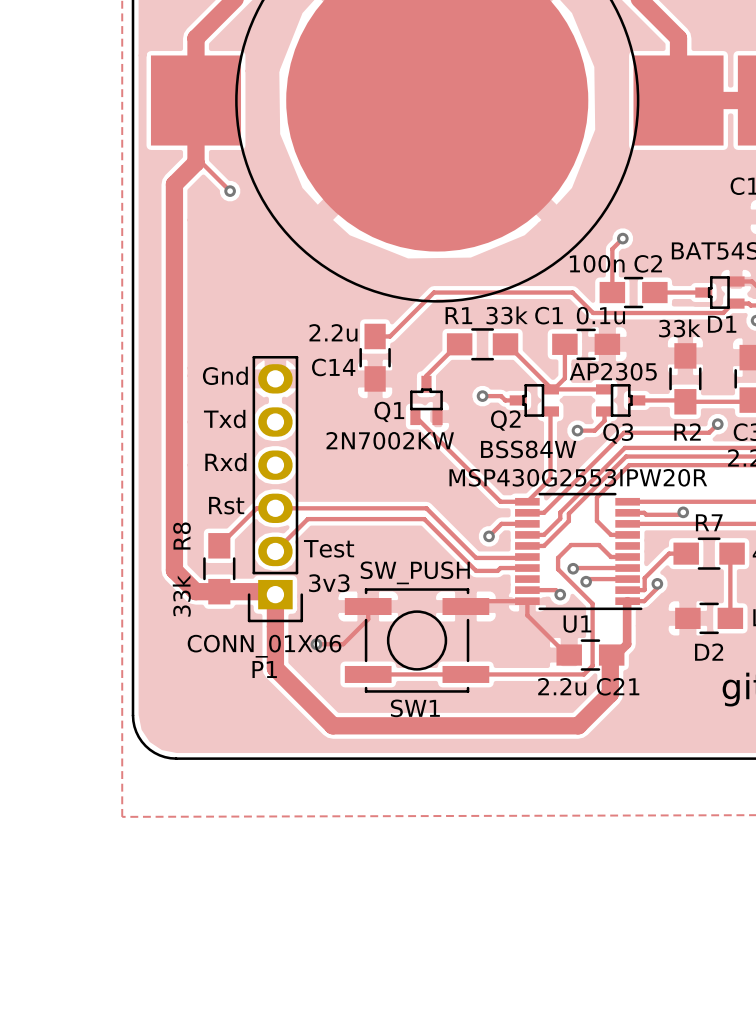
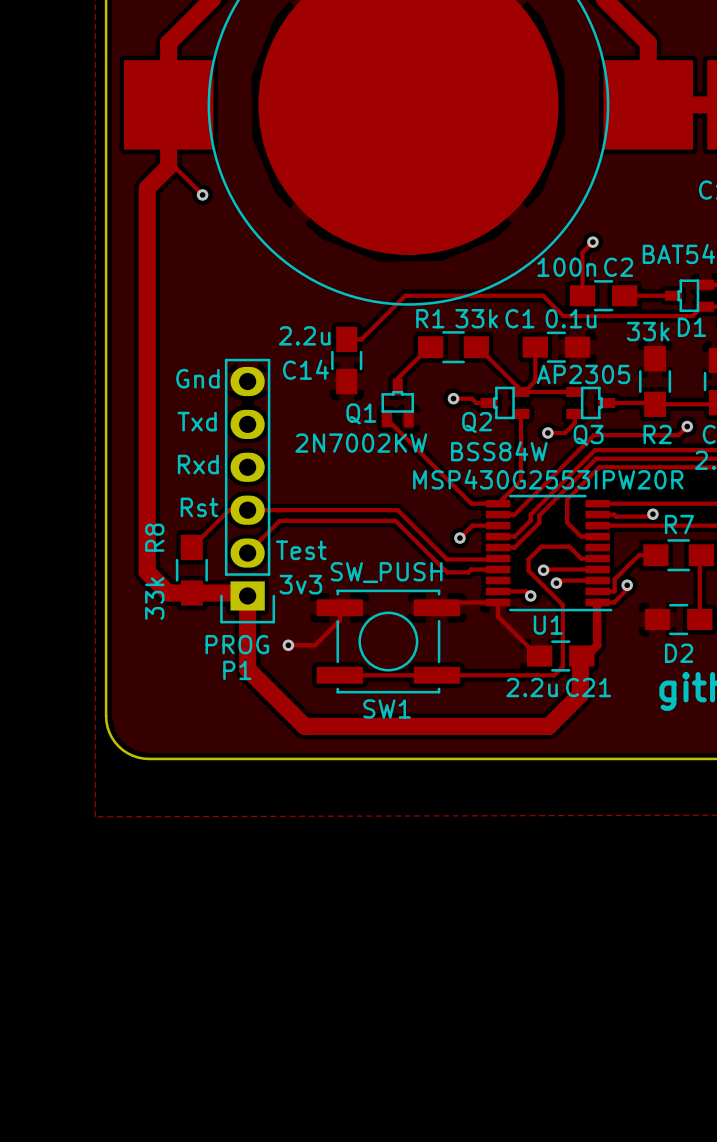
P1 value: CONN_01X06 (264, 646) -> PROG (237, 644)

